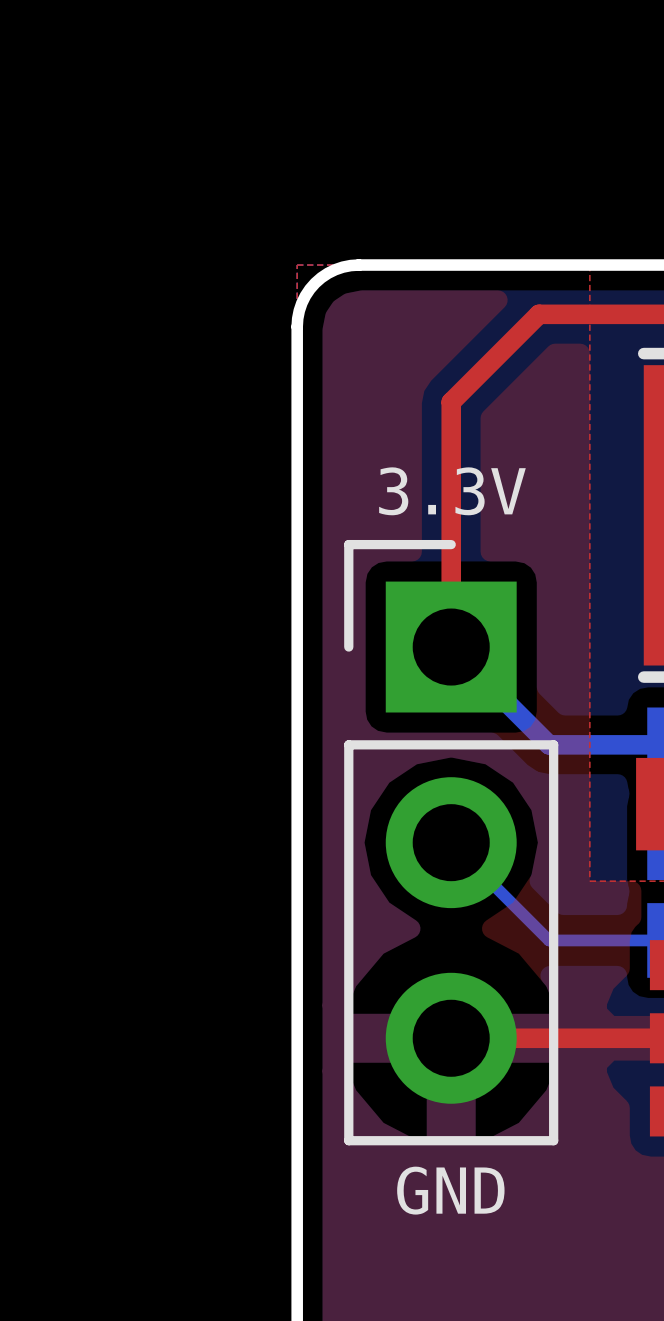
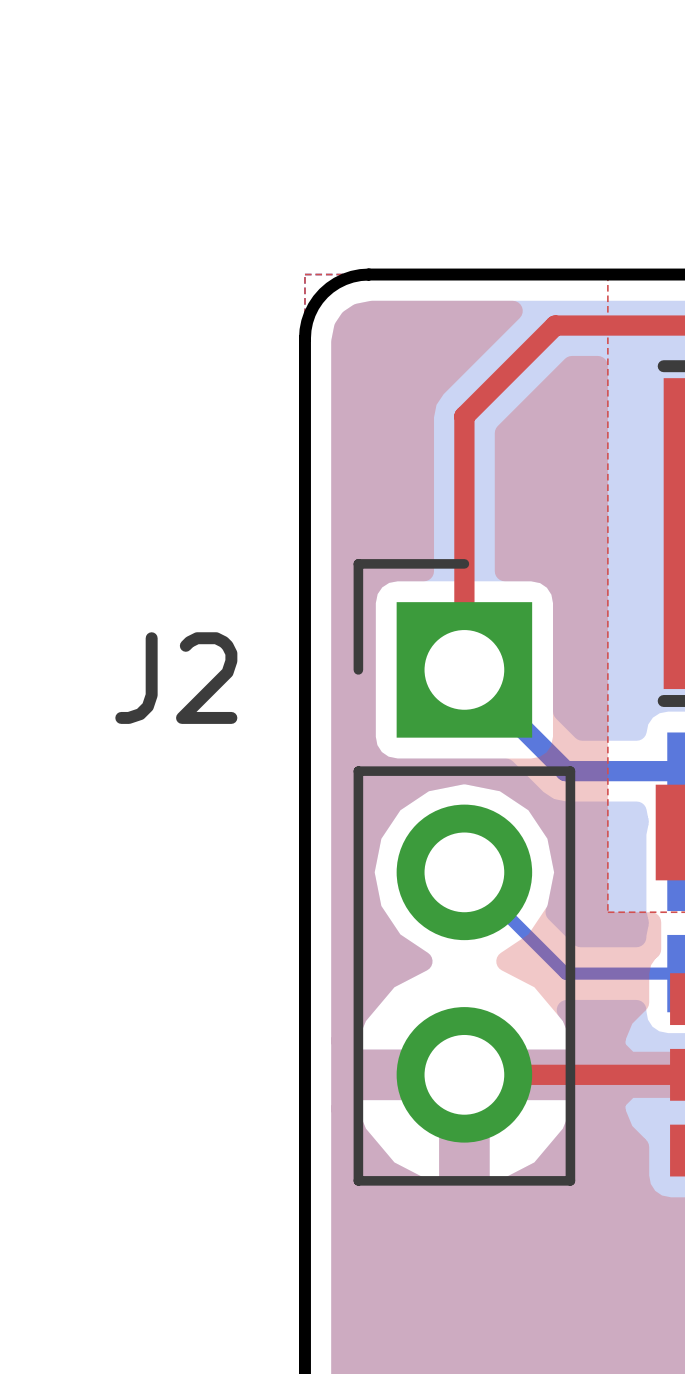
text: 3.3V (452, 491) -> none
J2 name: none -> J2 (176, 678)
text: GND (450, 1190) -> none

